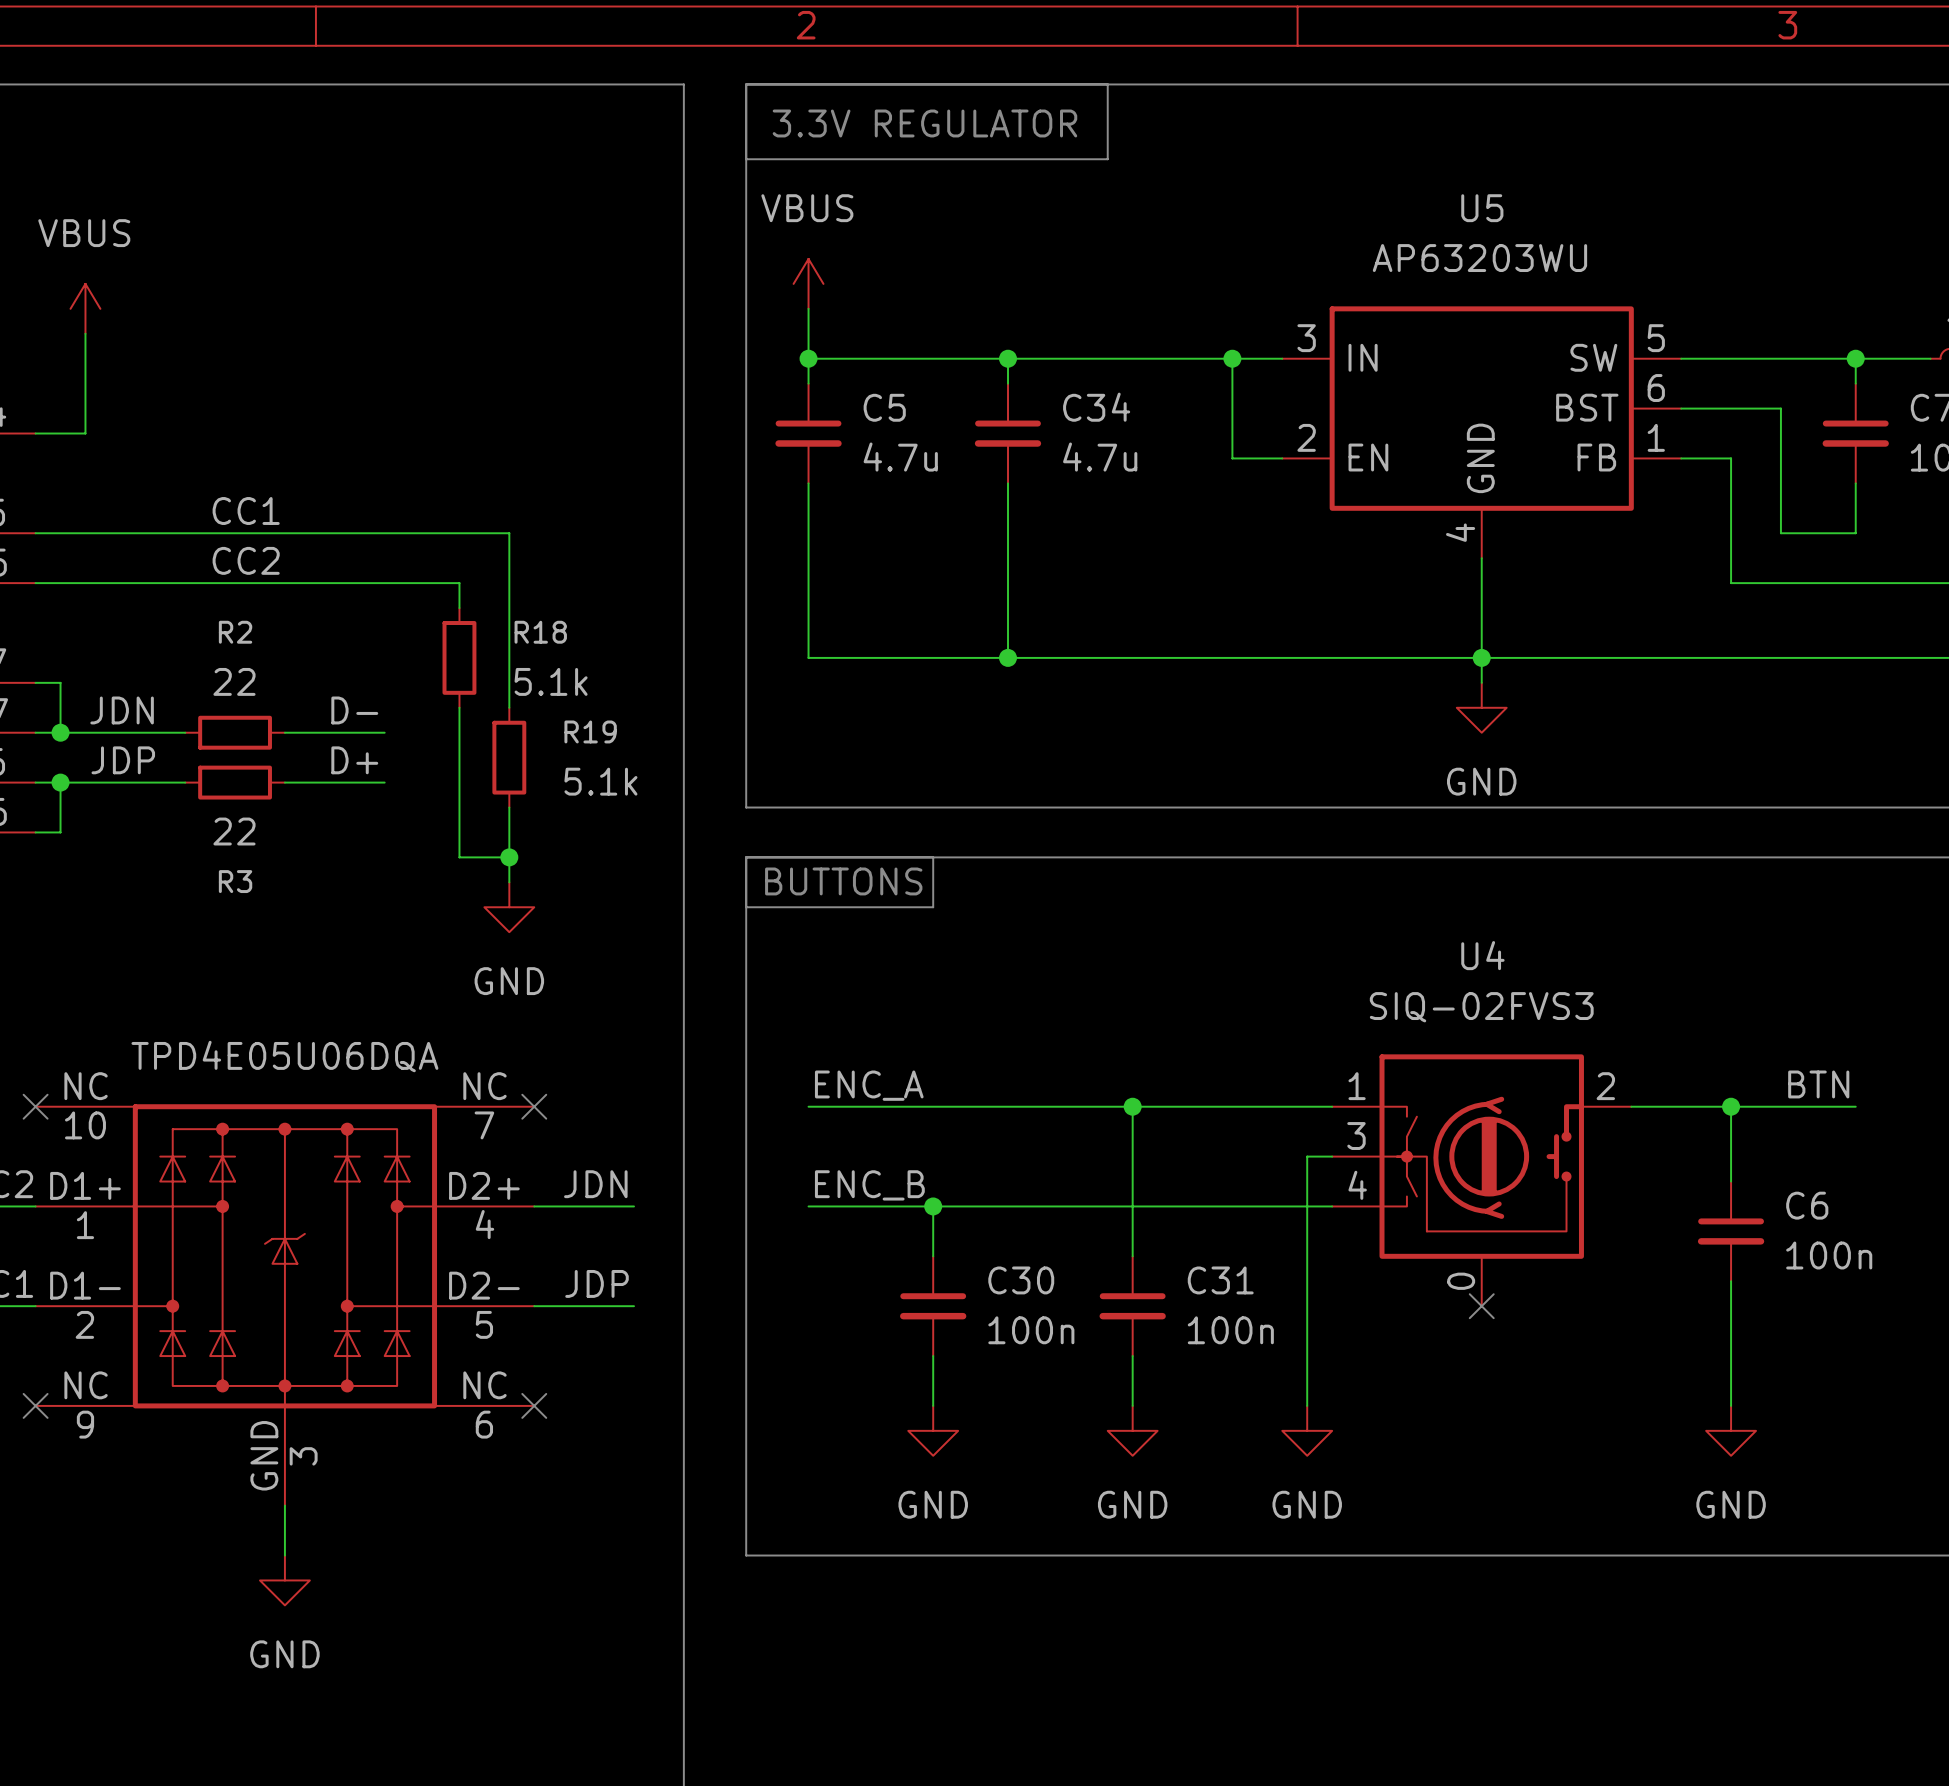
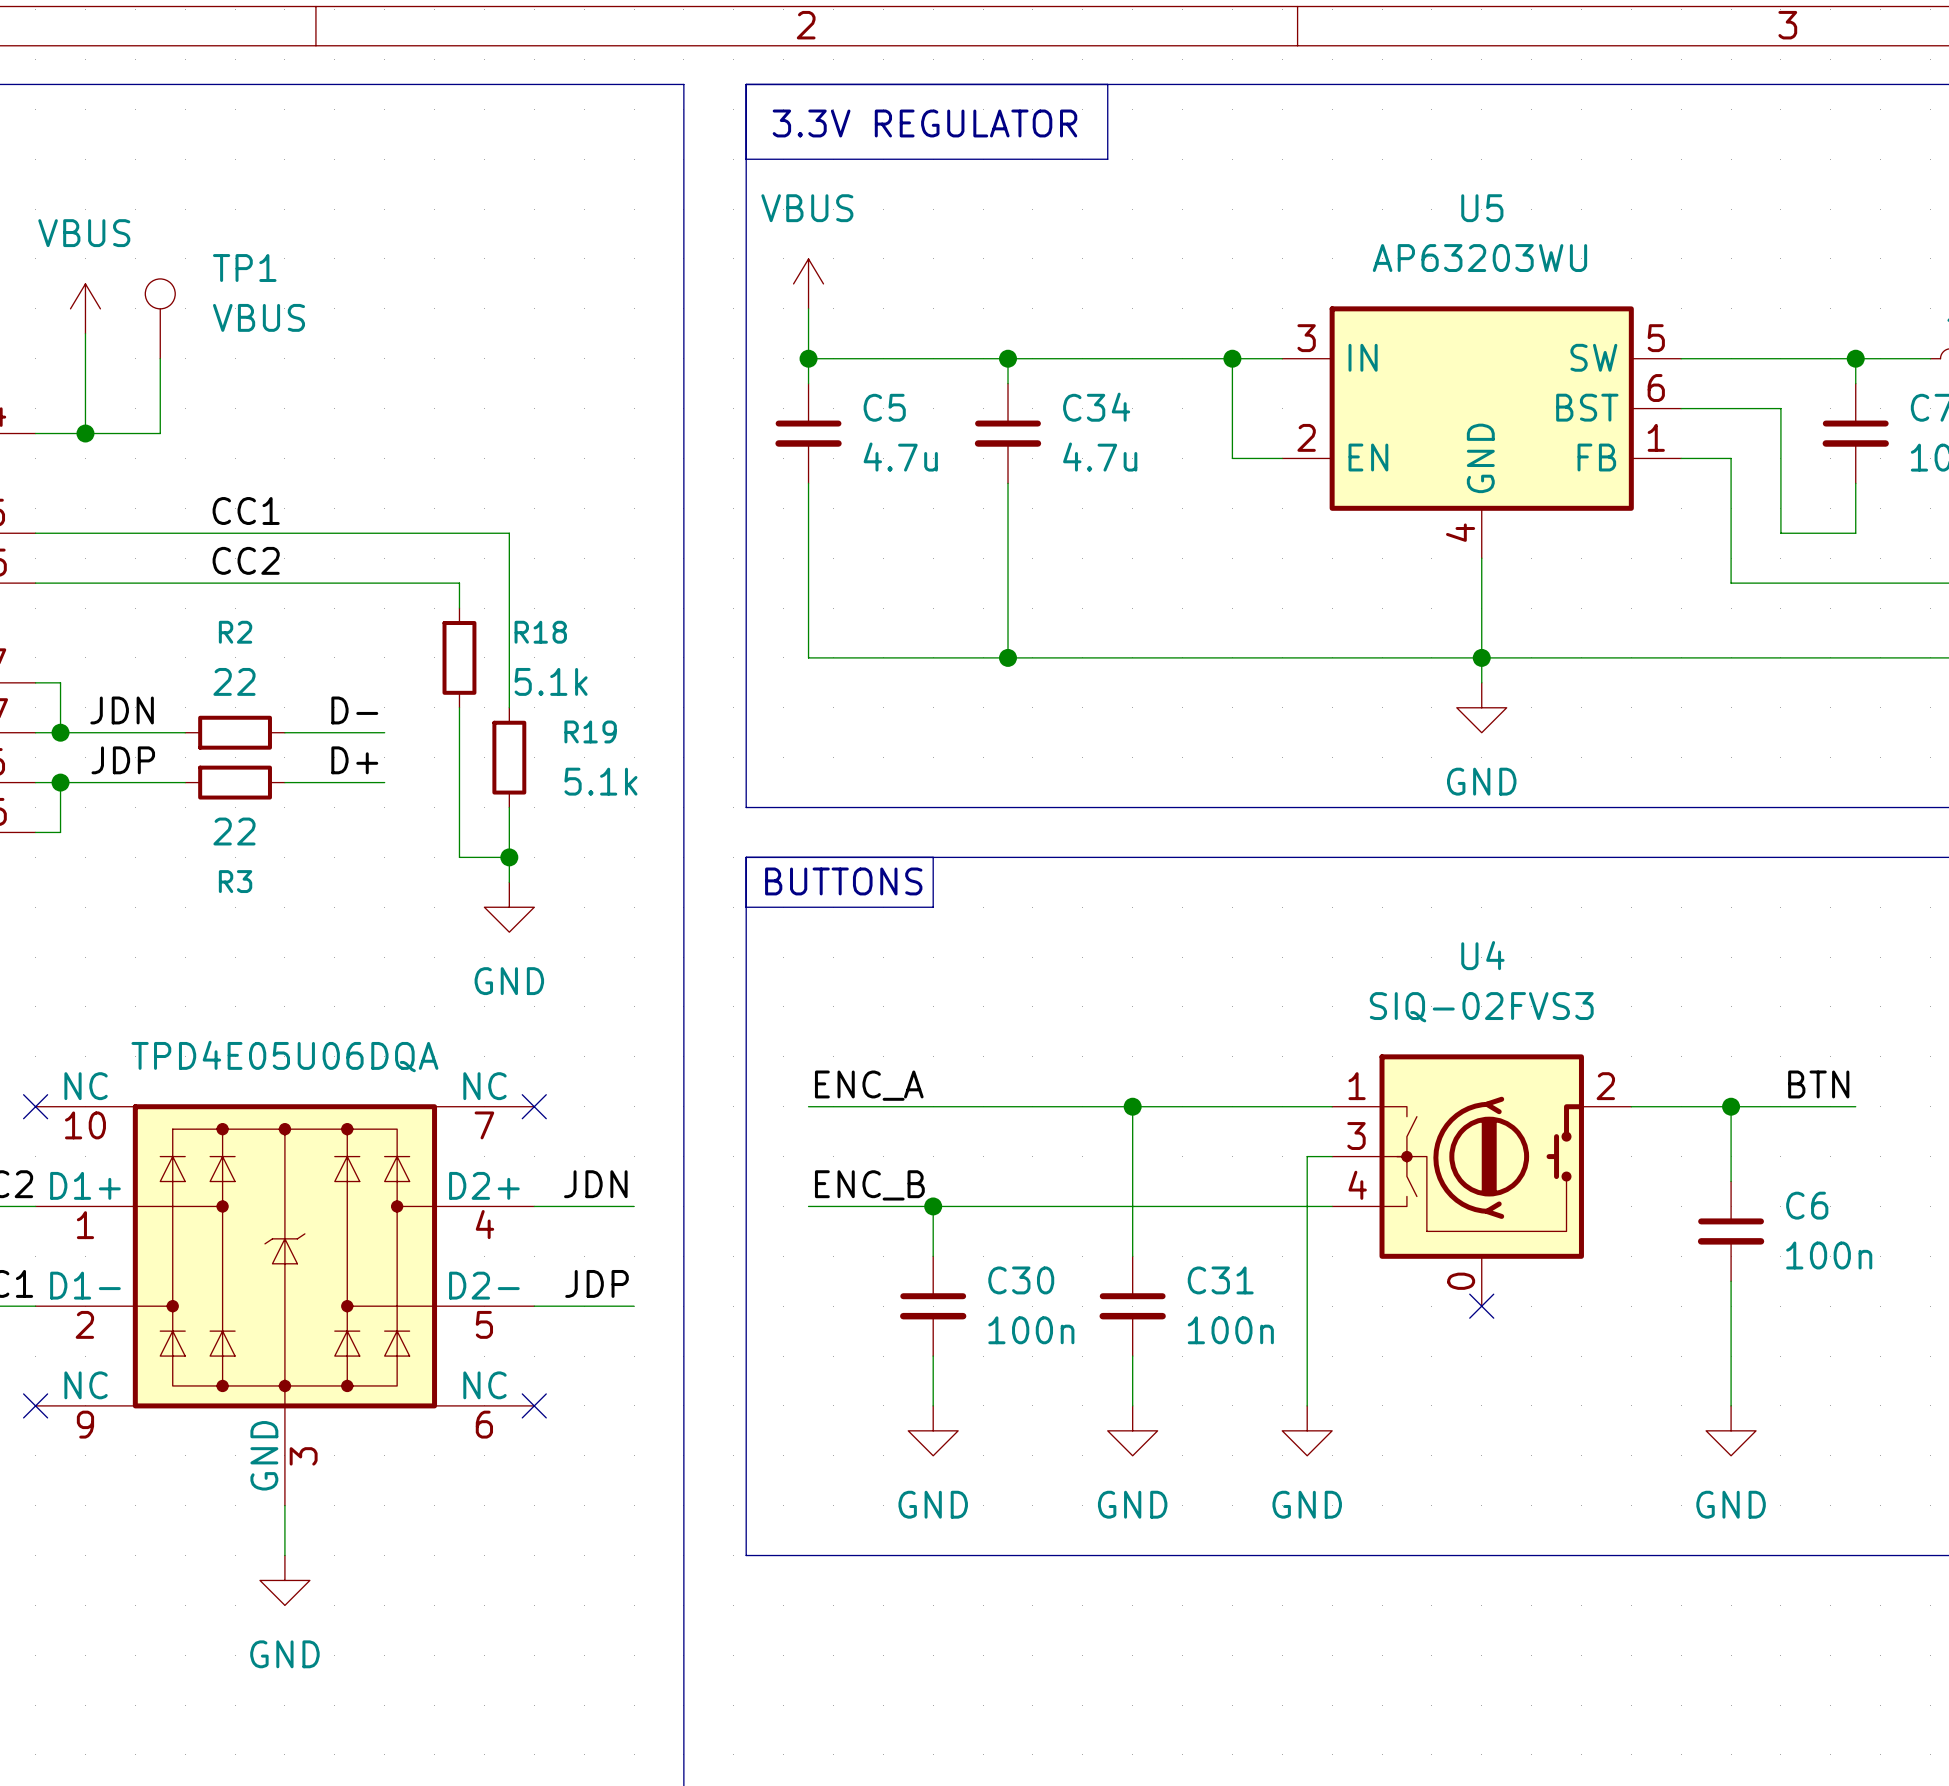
TP1: none -> VBUS (160, 318)
wire: none -> (160, 358) (160, 433) (85, 433)
junction: none -> (85, 433)

